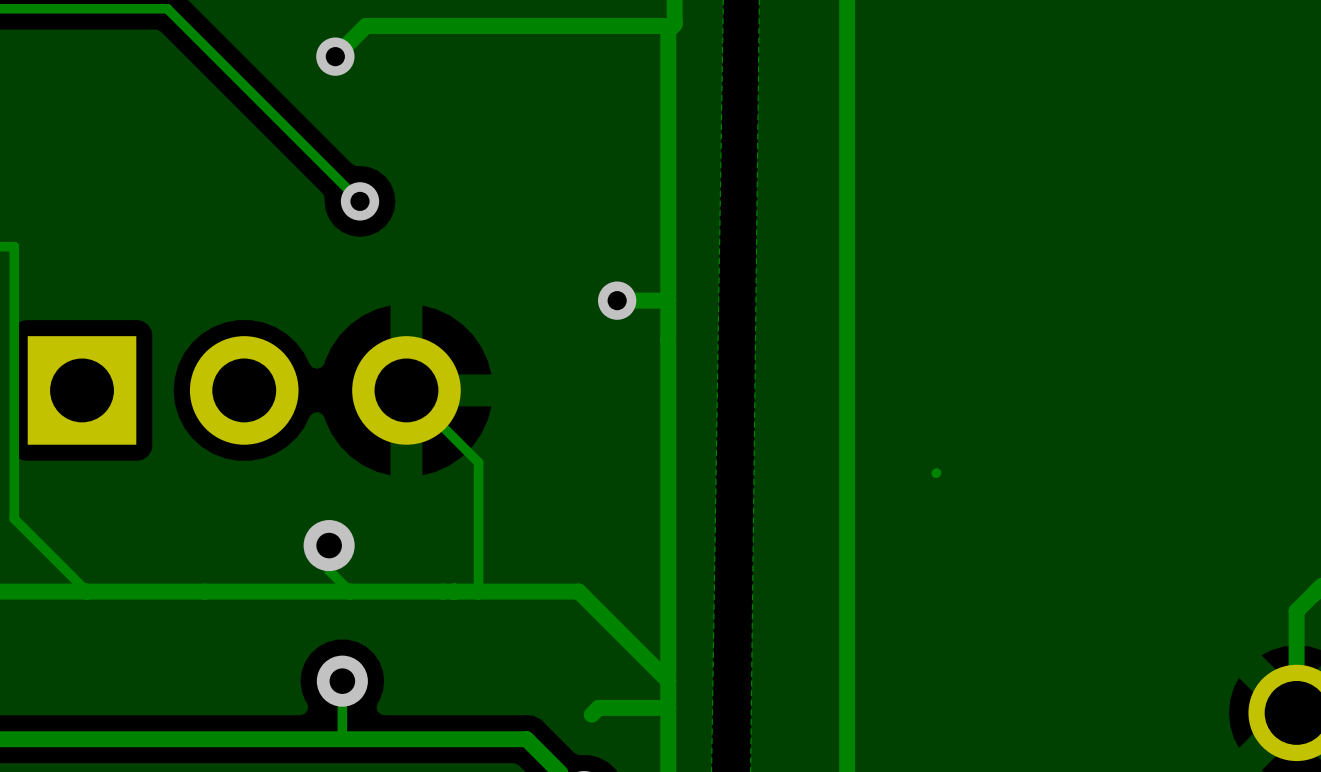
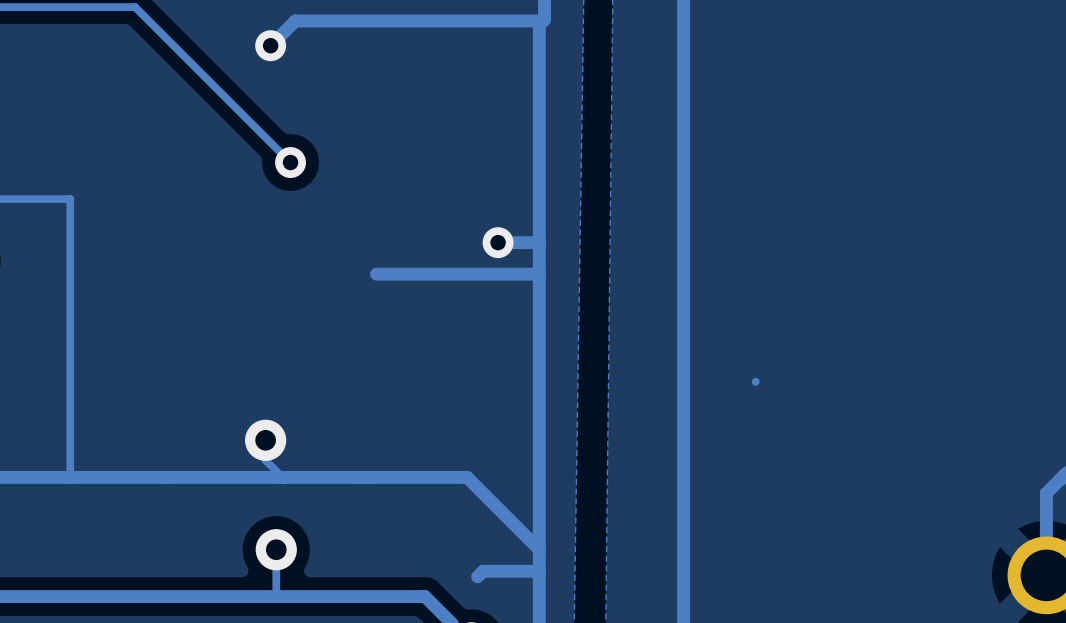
track: (14, 246) (14, 518) (87, 591) -> (11, 199) (70, 199) (70, 477)
track: none -> (539, 274) (376, 274)
part: (244, 390) -> none
track: (406, 390) (478, 462) (478, 591) -> none

